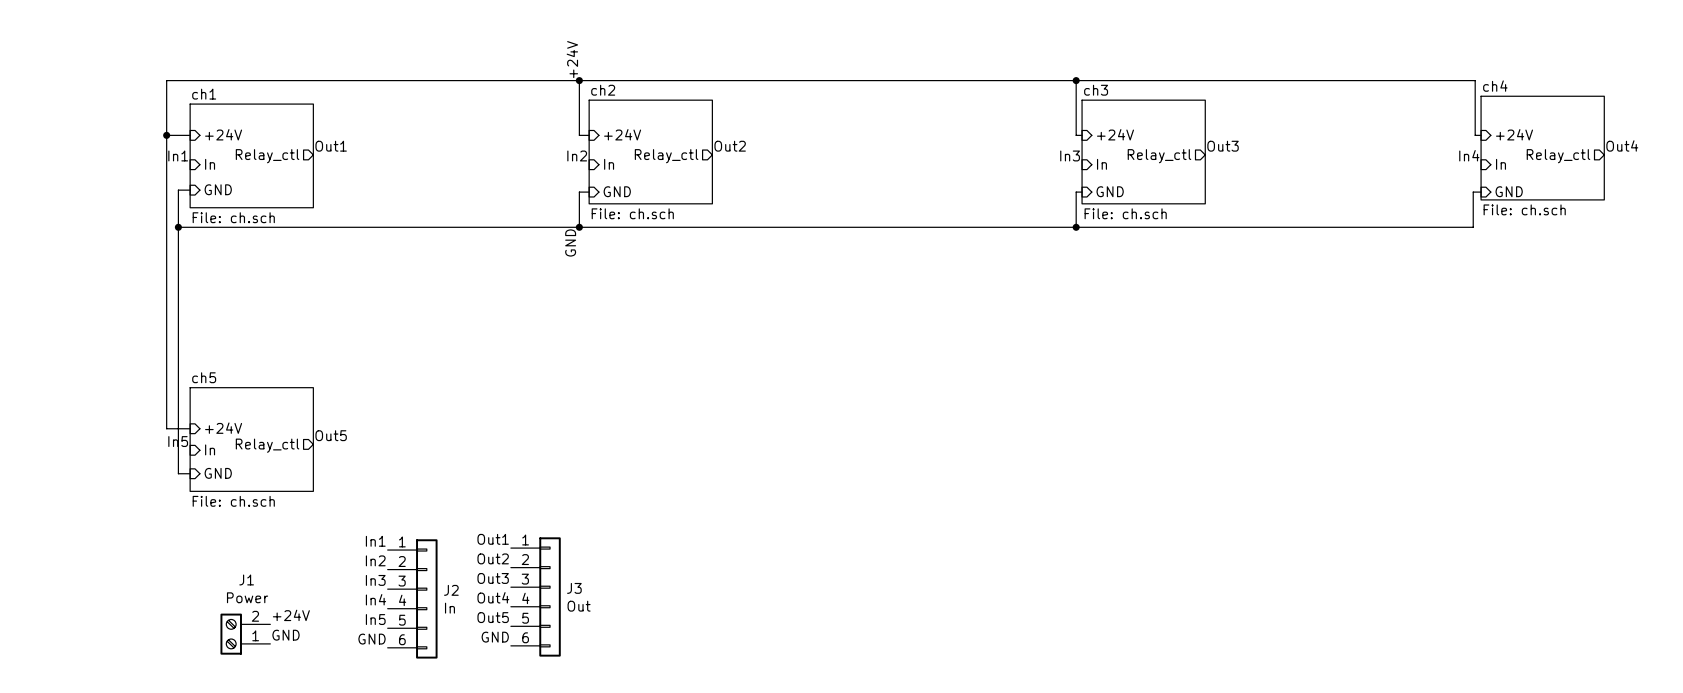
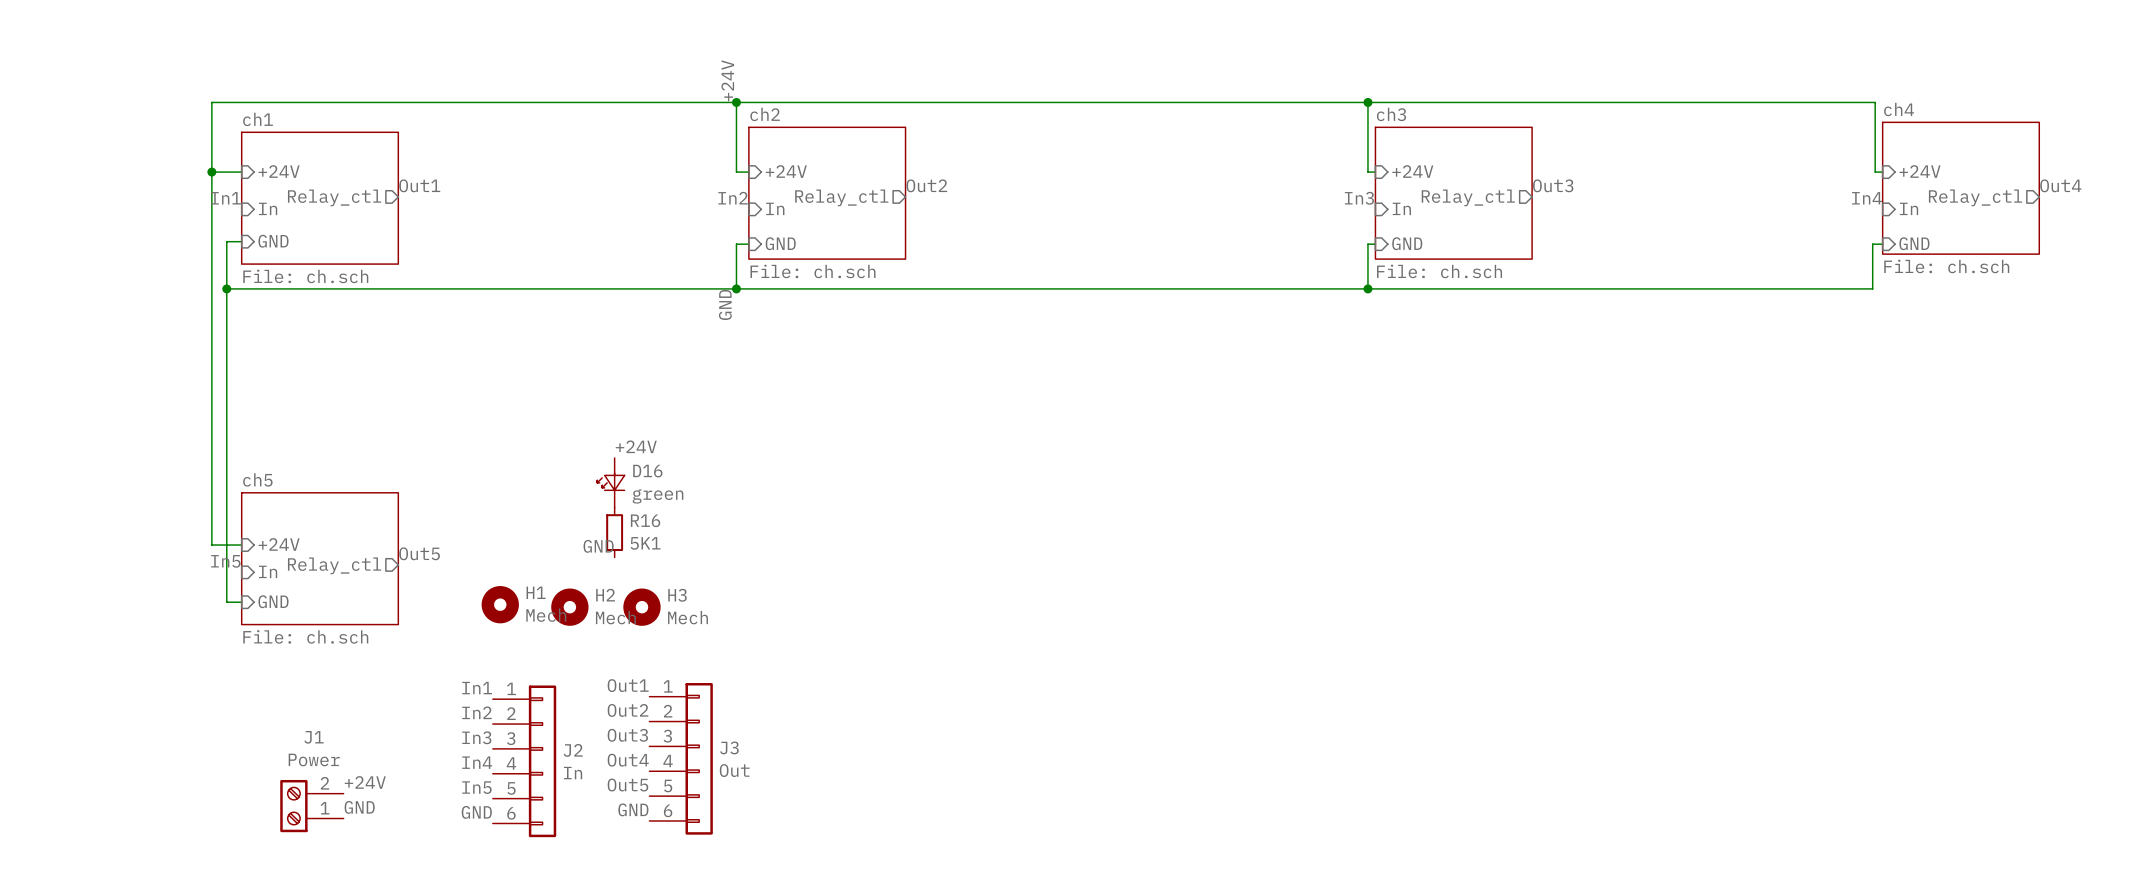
label: none -> +24V (636, 446)
D16: none -> green (610, 482)
R16: none -> 5K1 (614, 532)
label: none -> GND (598, 546)
H1: none -> Mech (500, 604)
H2: none -> Mech (569, 607)
H3: none -> Mech (641, 607)

